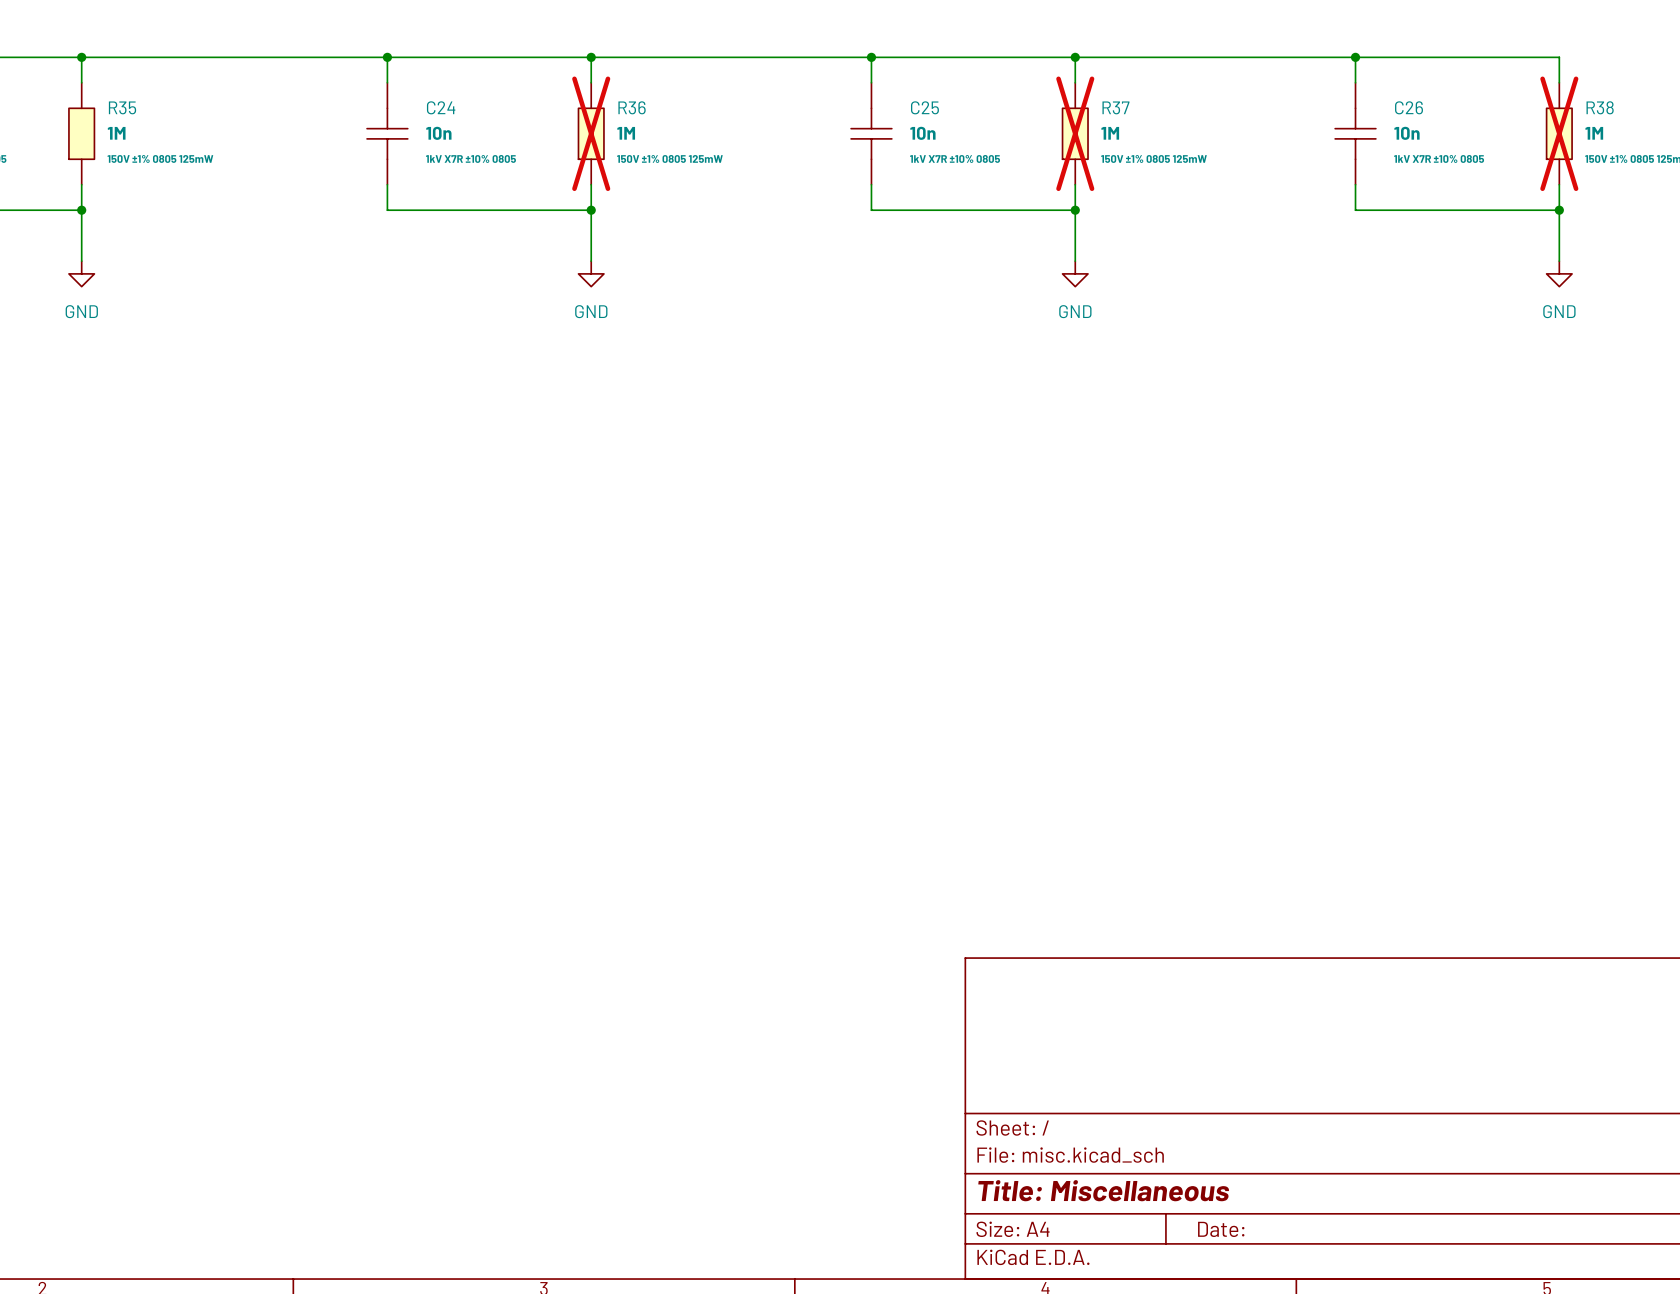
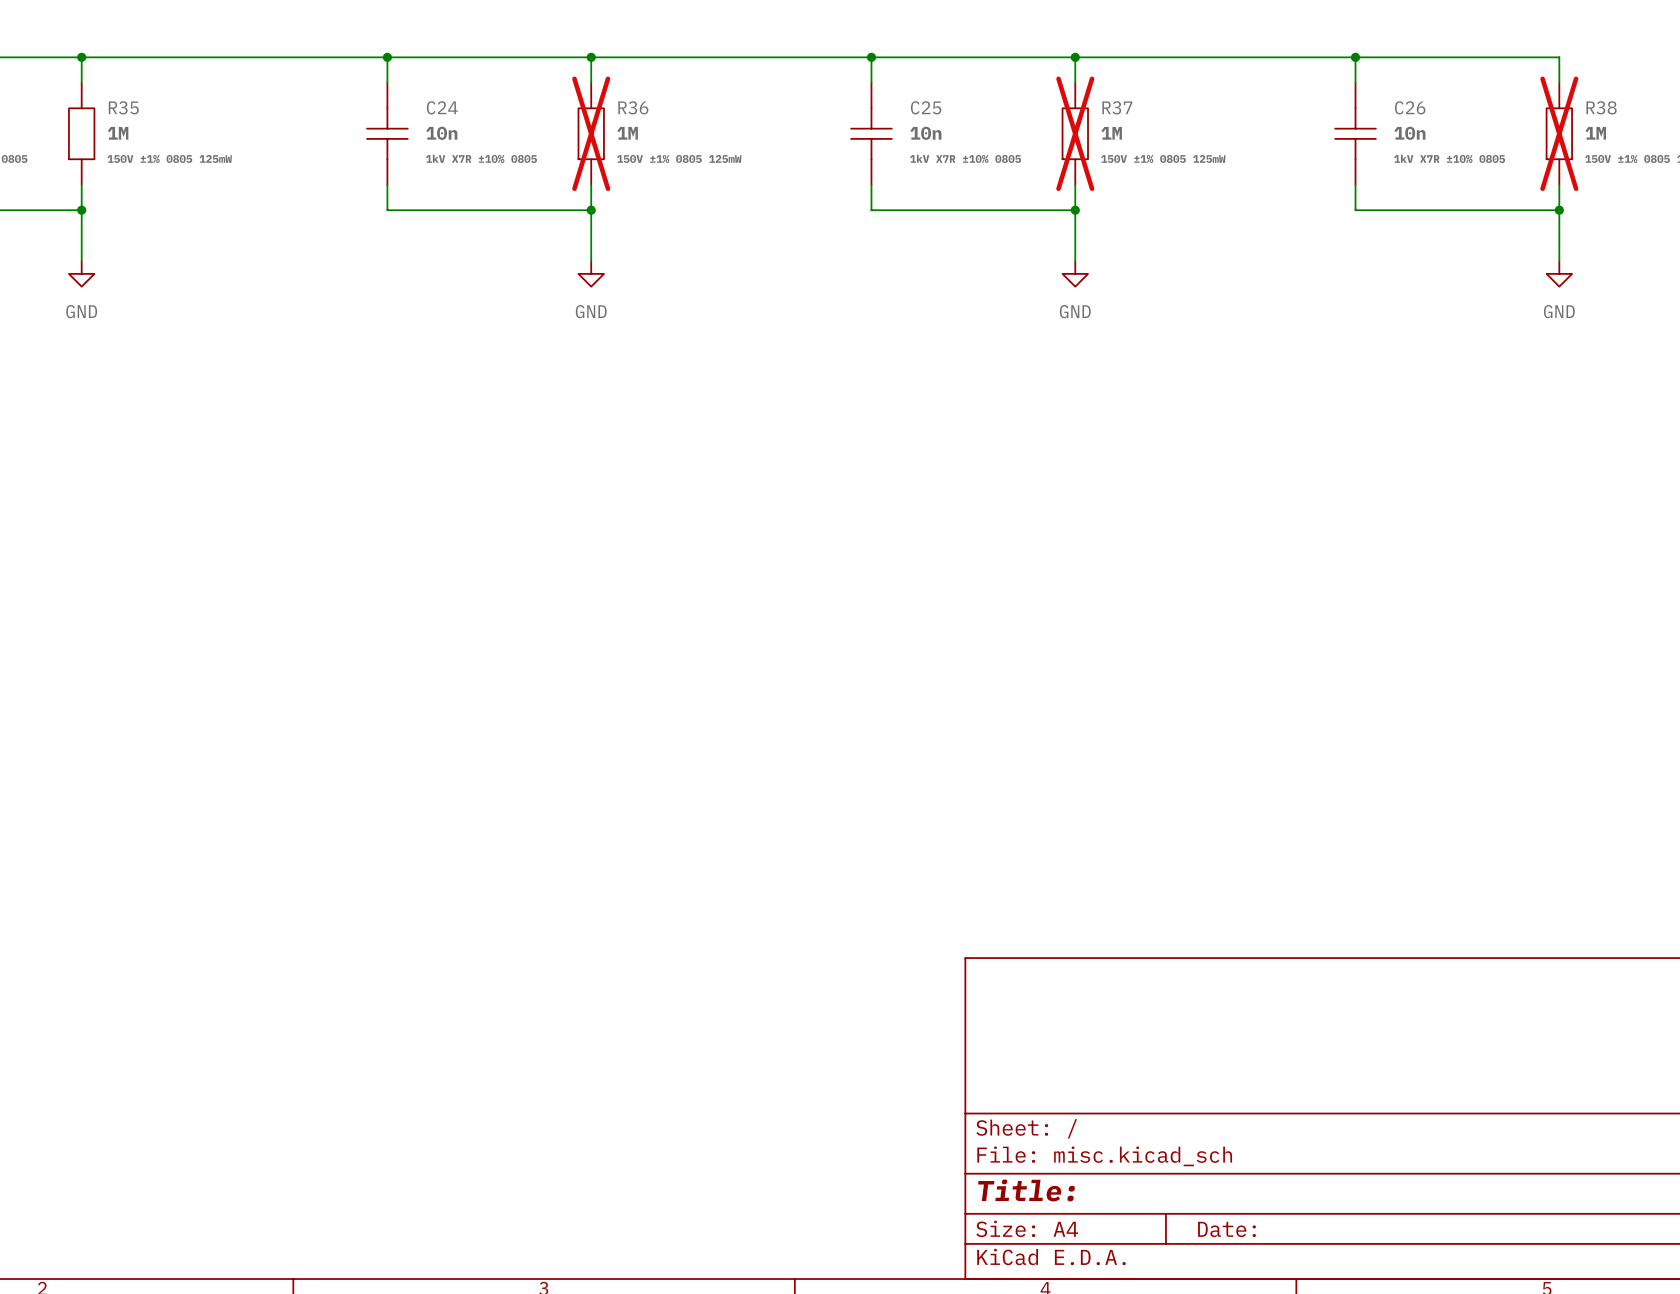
title block: Title: Miscellaneous (1103, 1190) -> Title: (1026, 1190)

